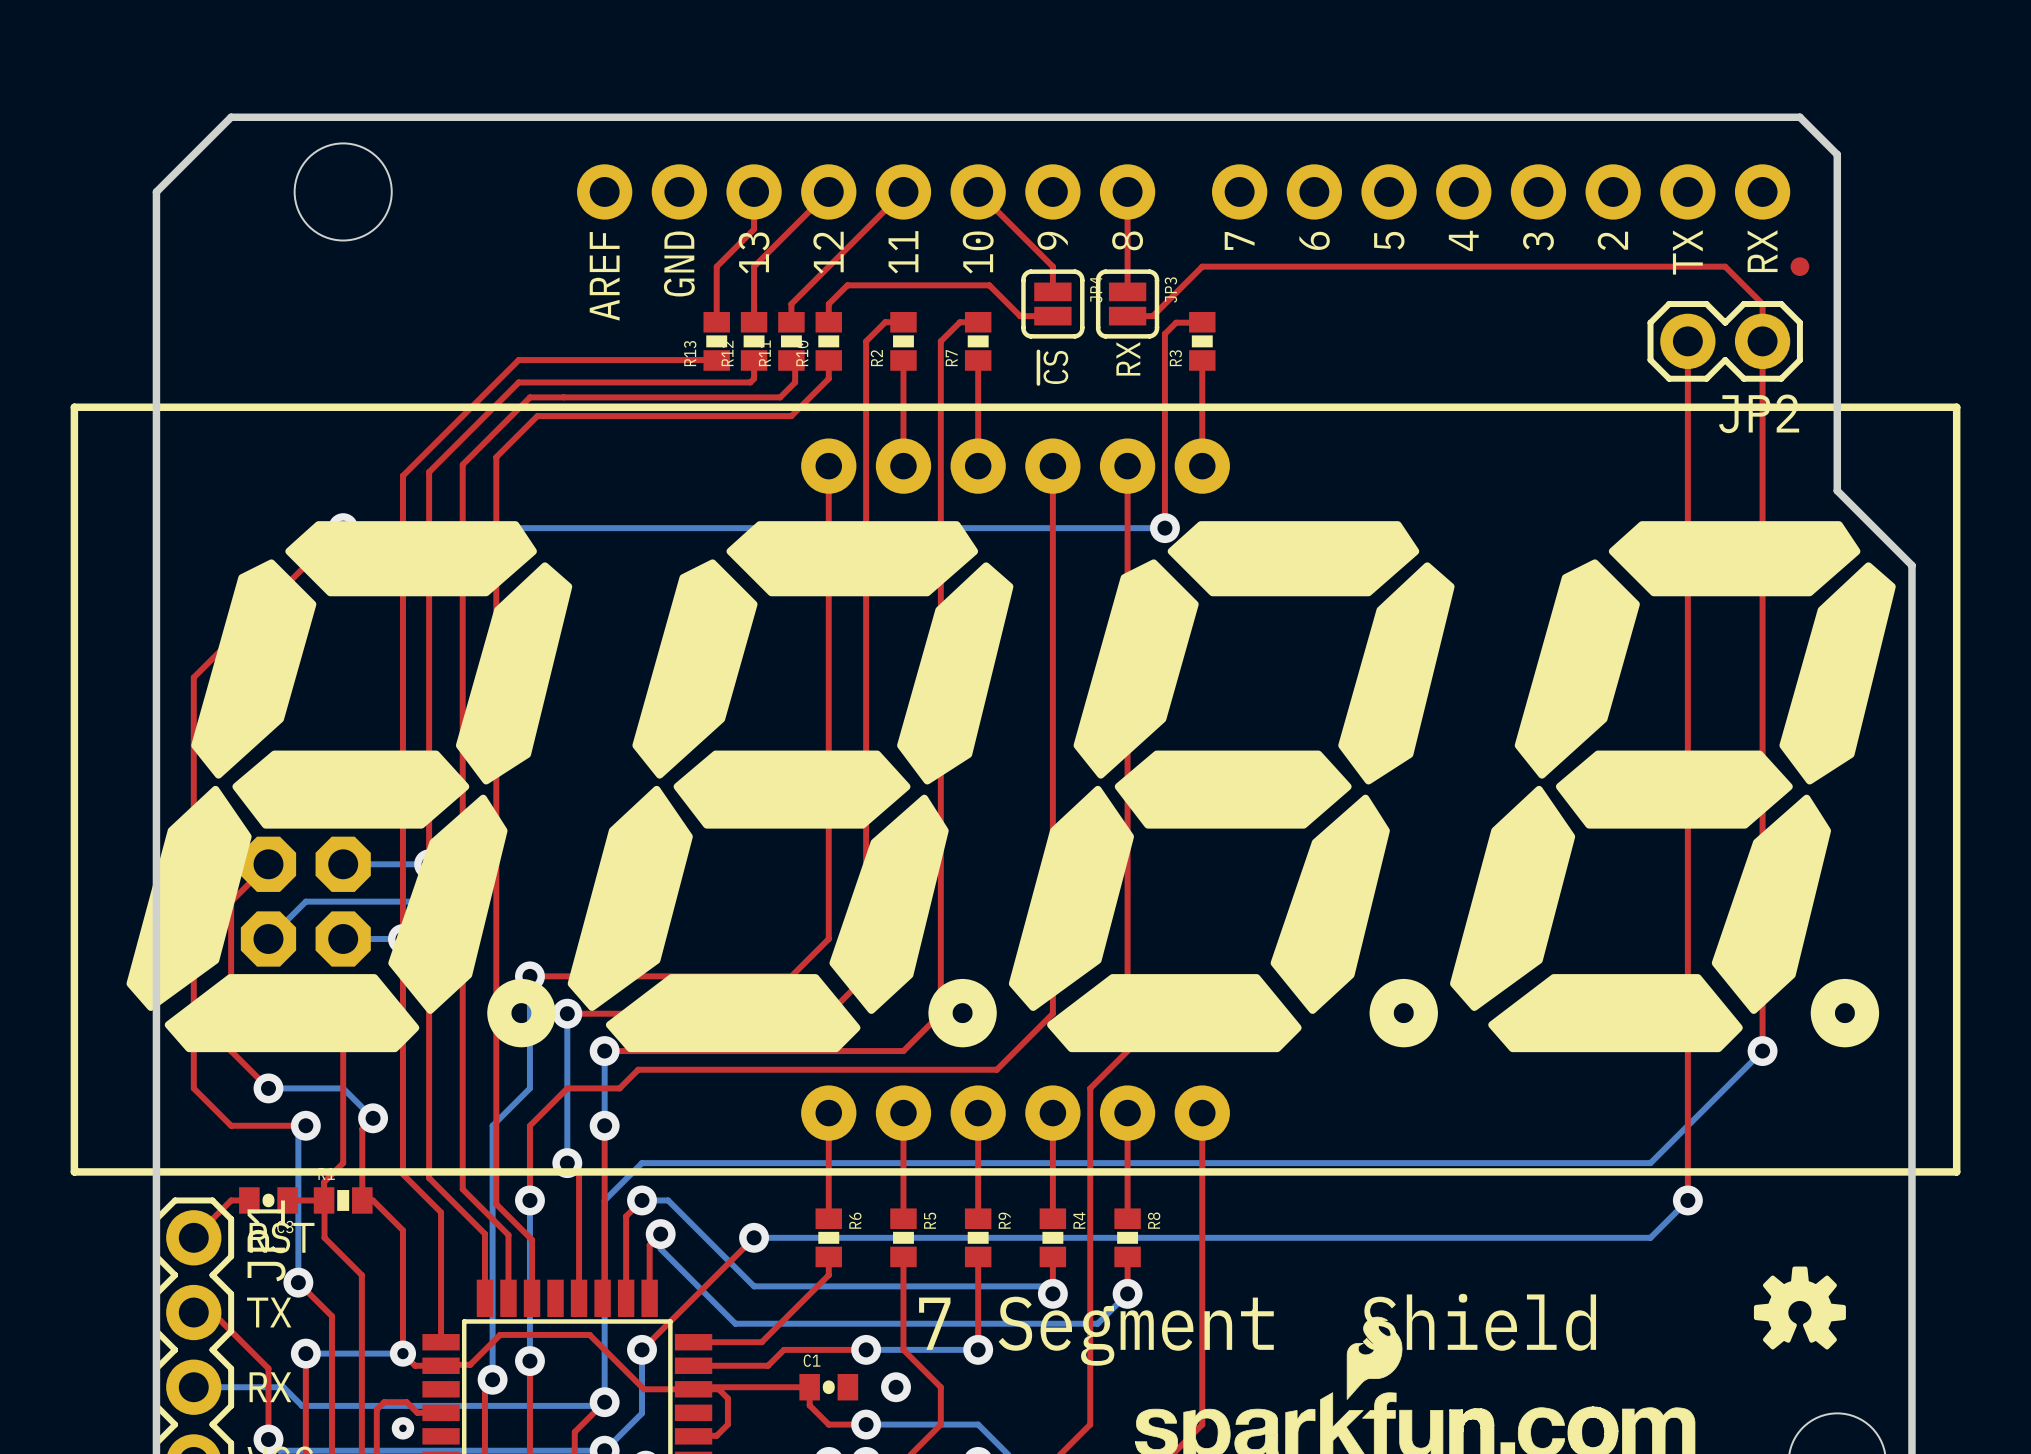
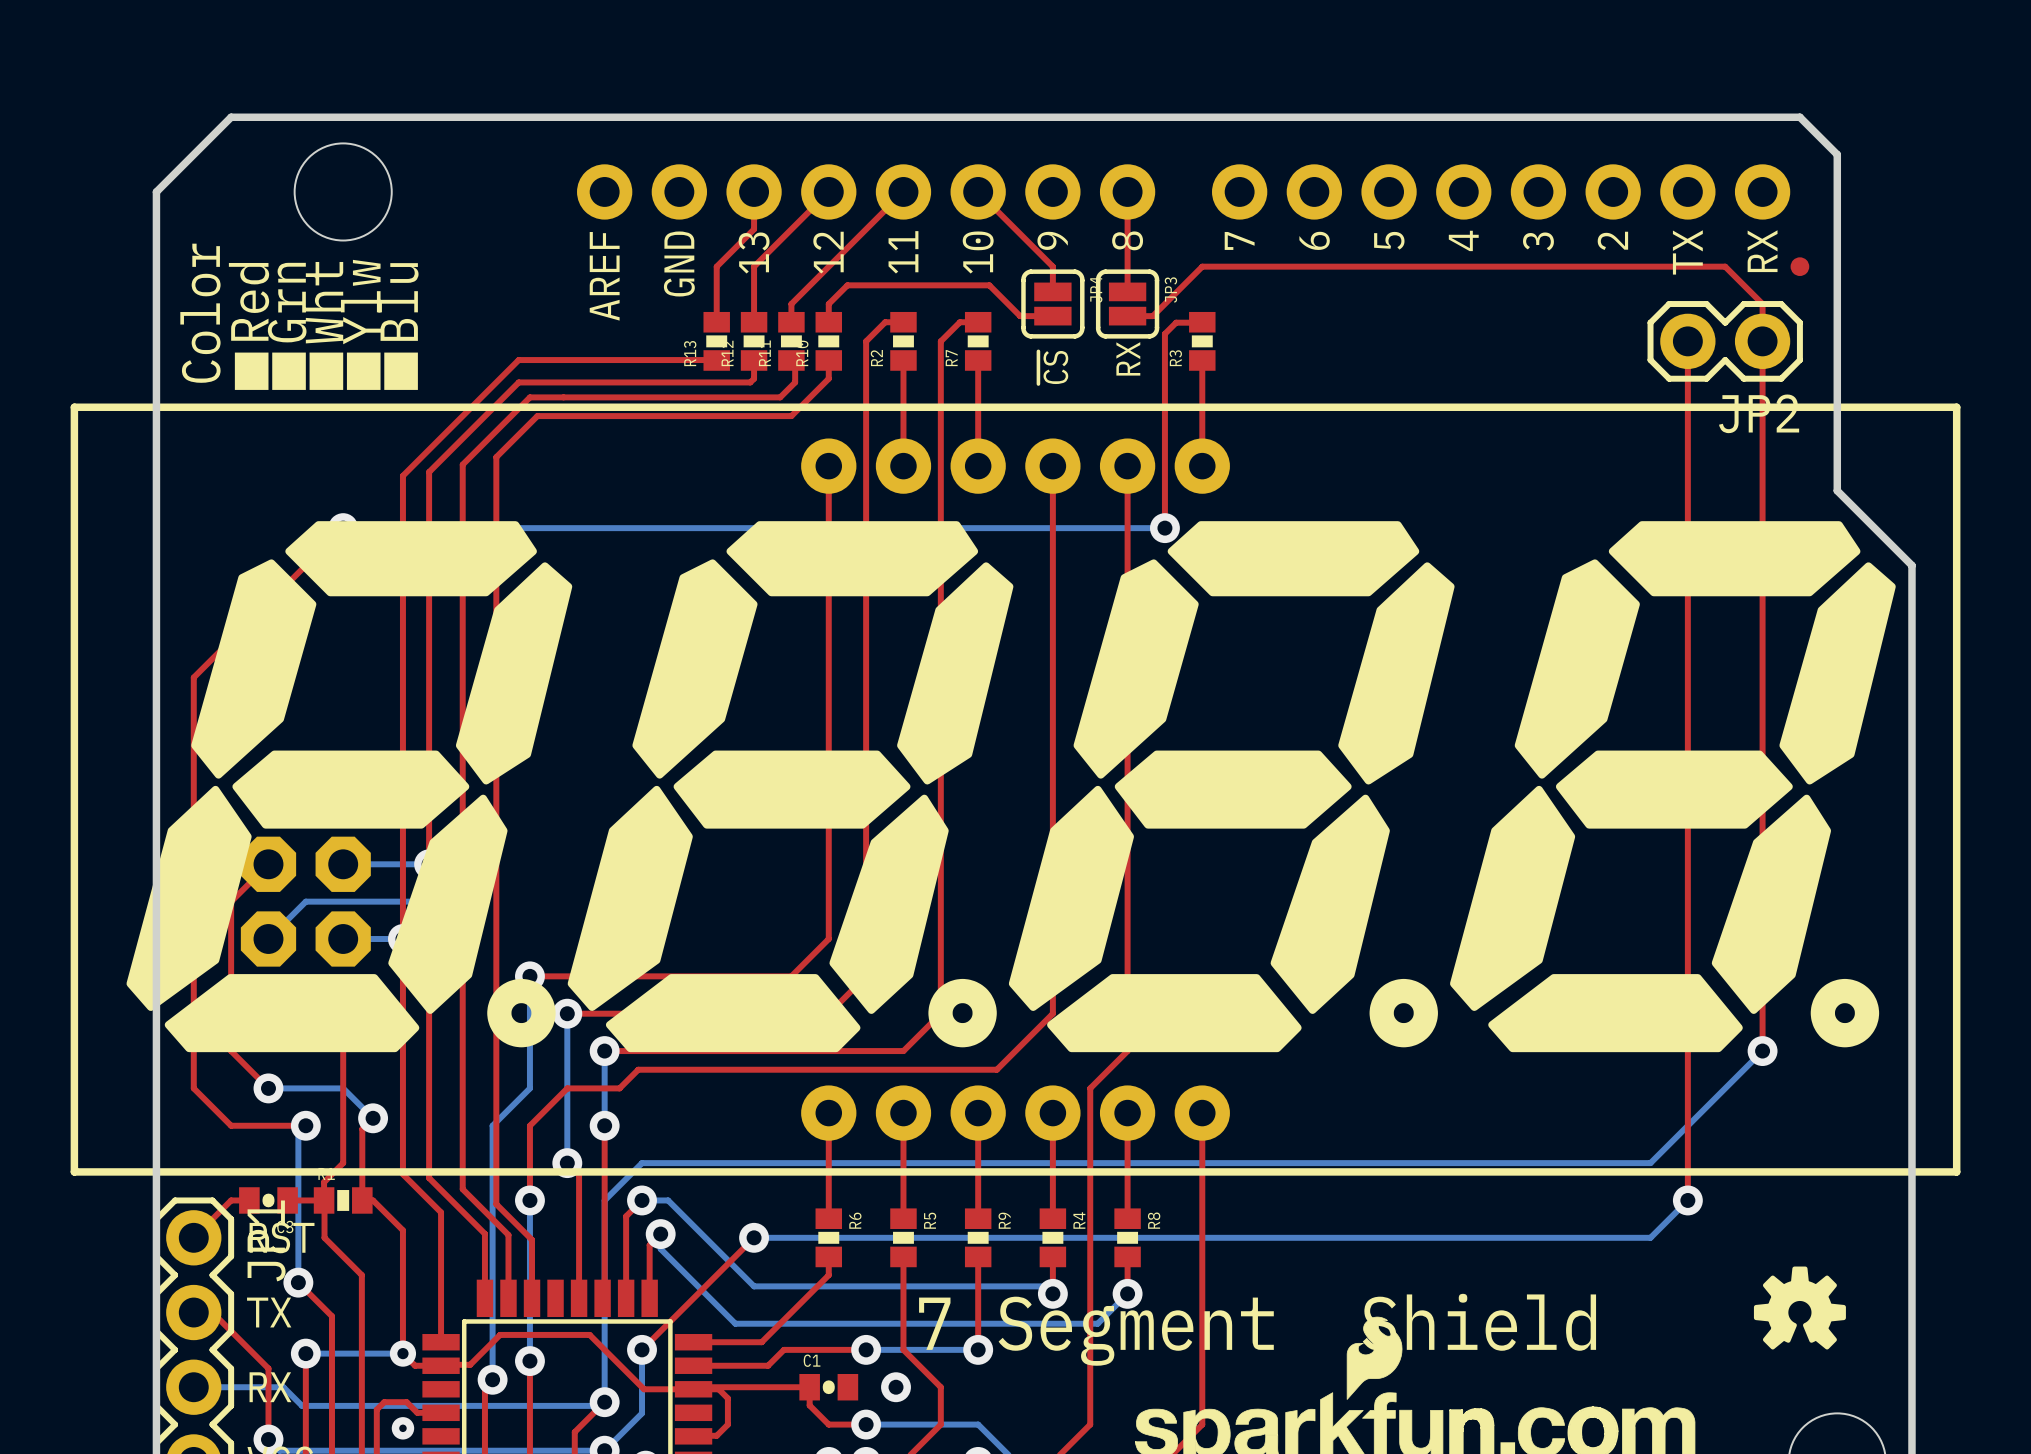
text: none -> Red (249, 301)
text: none -> Blu (398, 301)
text: none -> Grn (287, 302)
text: none -> Wht (323, 302)
text: none -> Ylw (360, 302)
text: none -> Color (200, 313)
drawing: none -> [234, 352, 418, 390]

